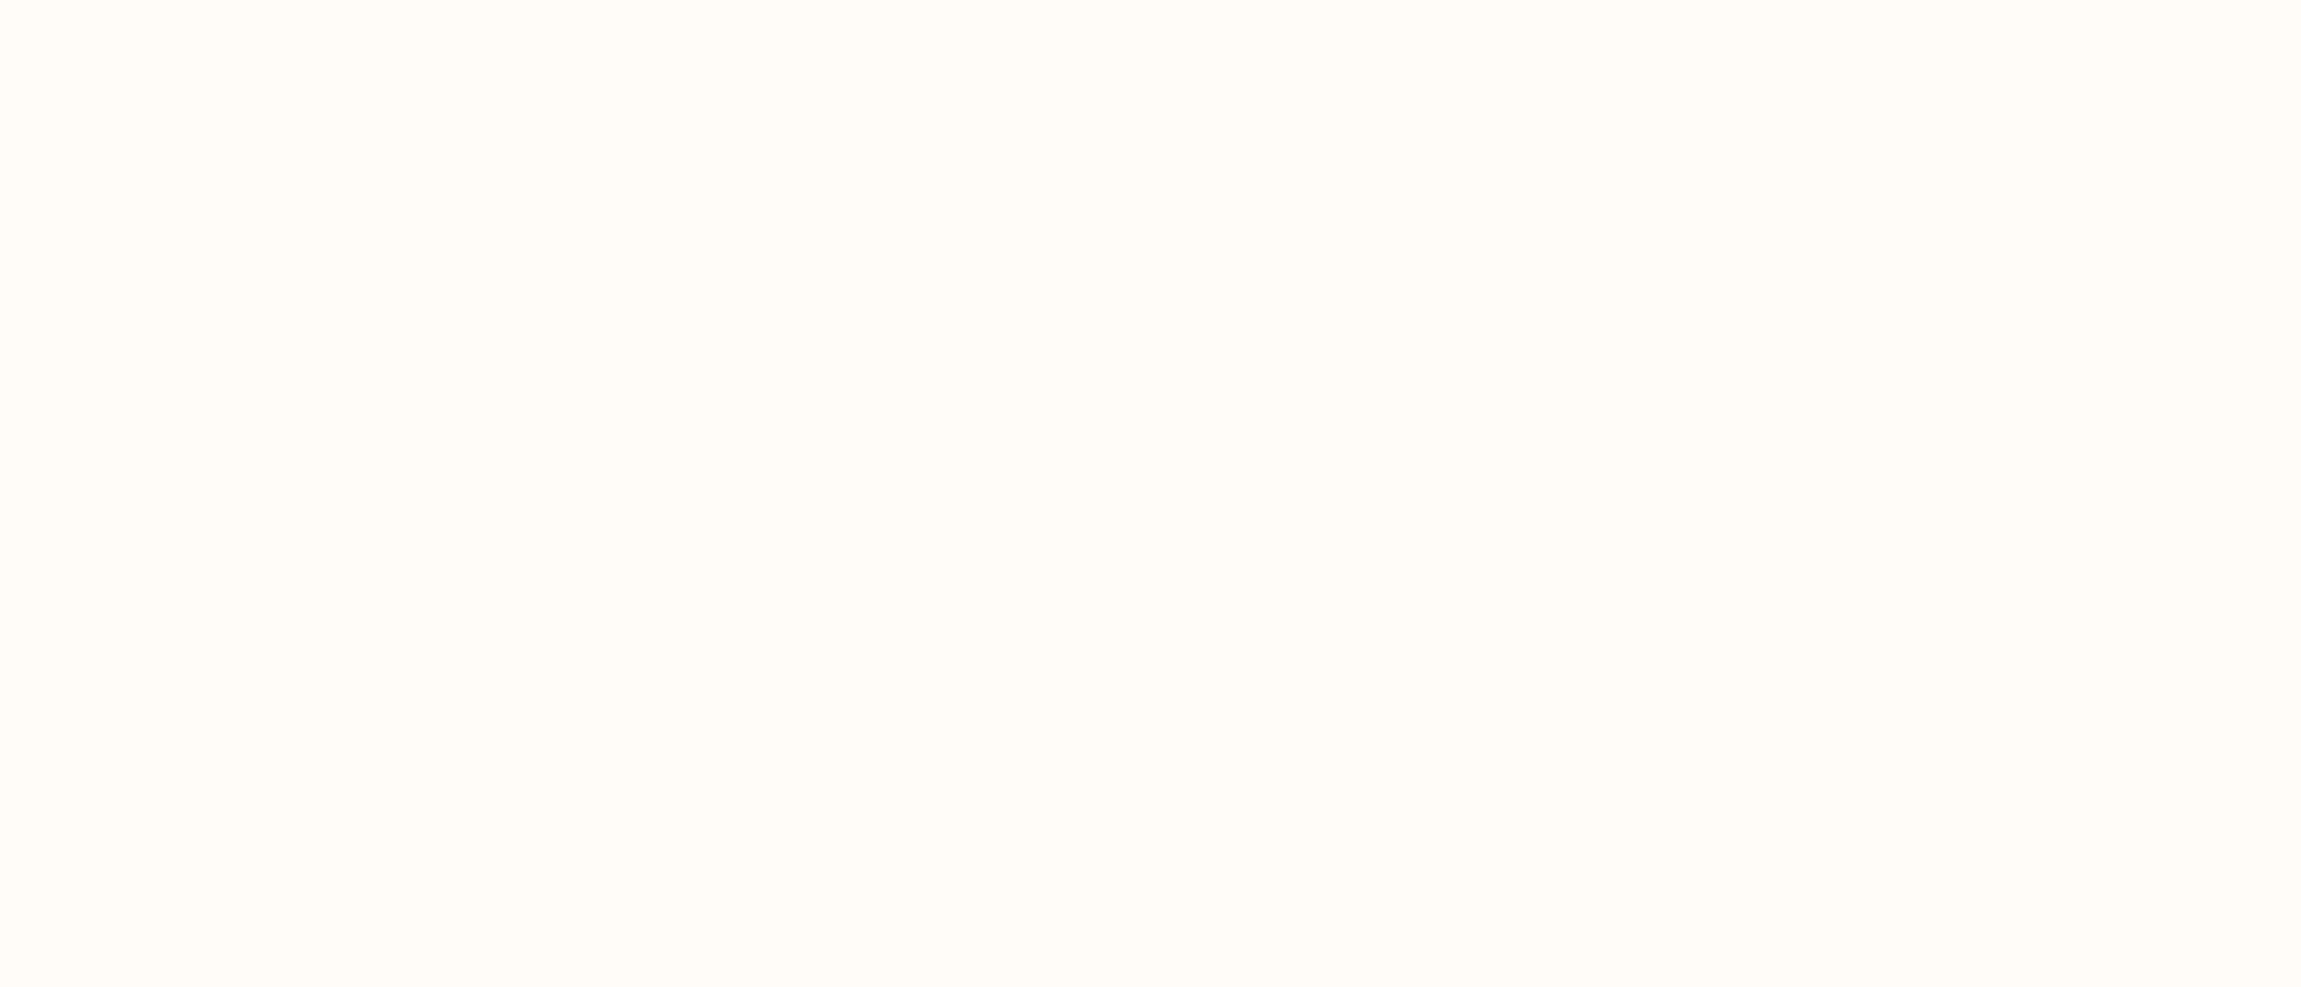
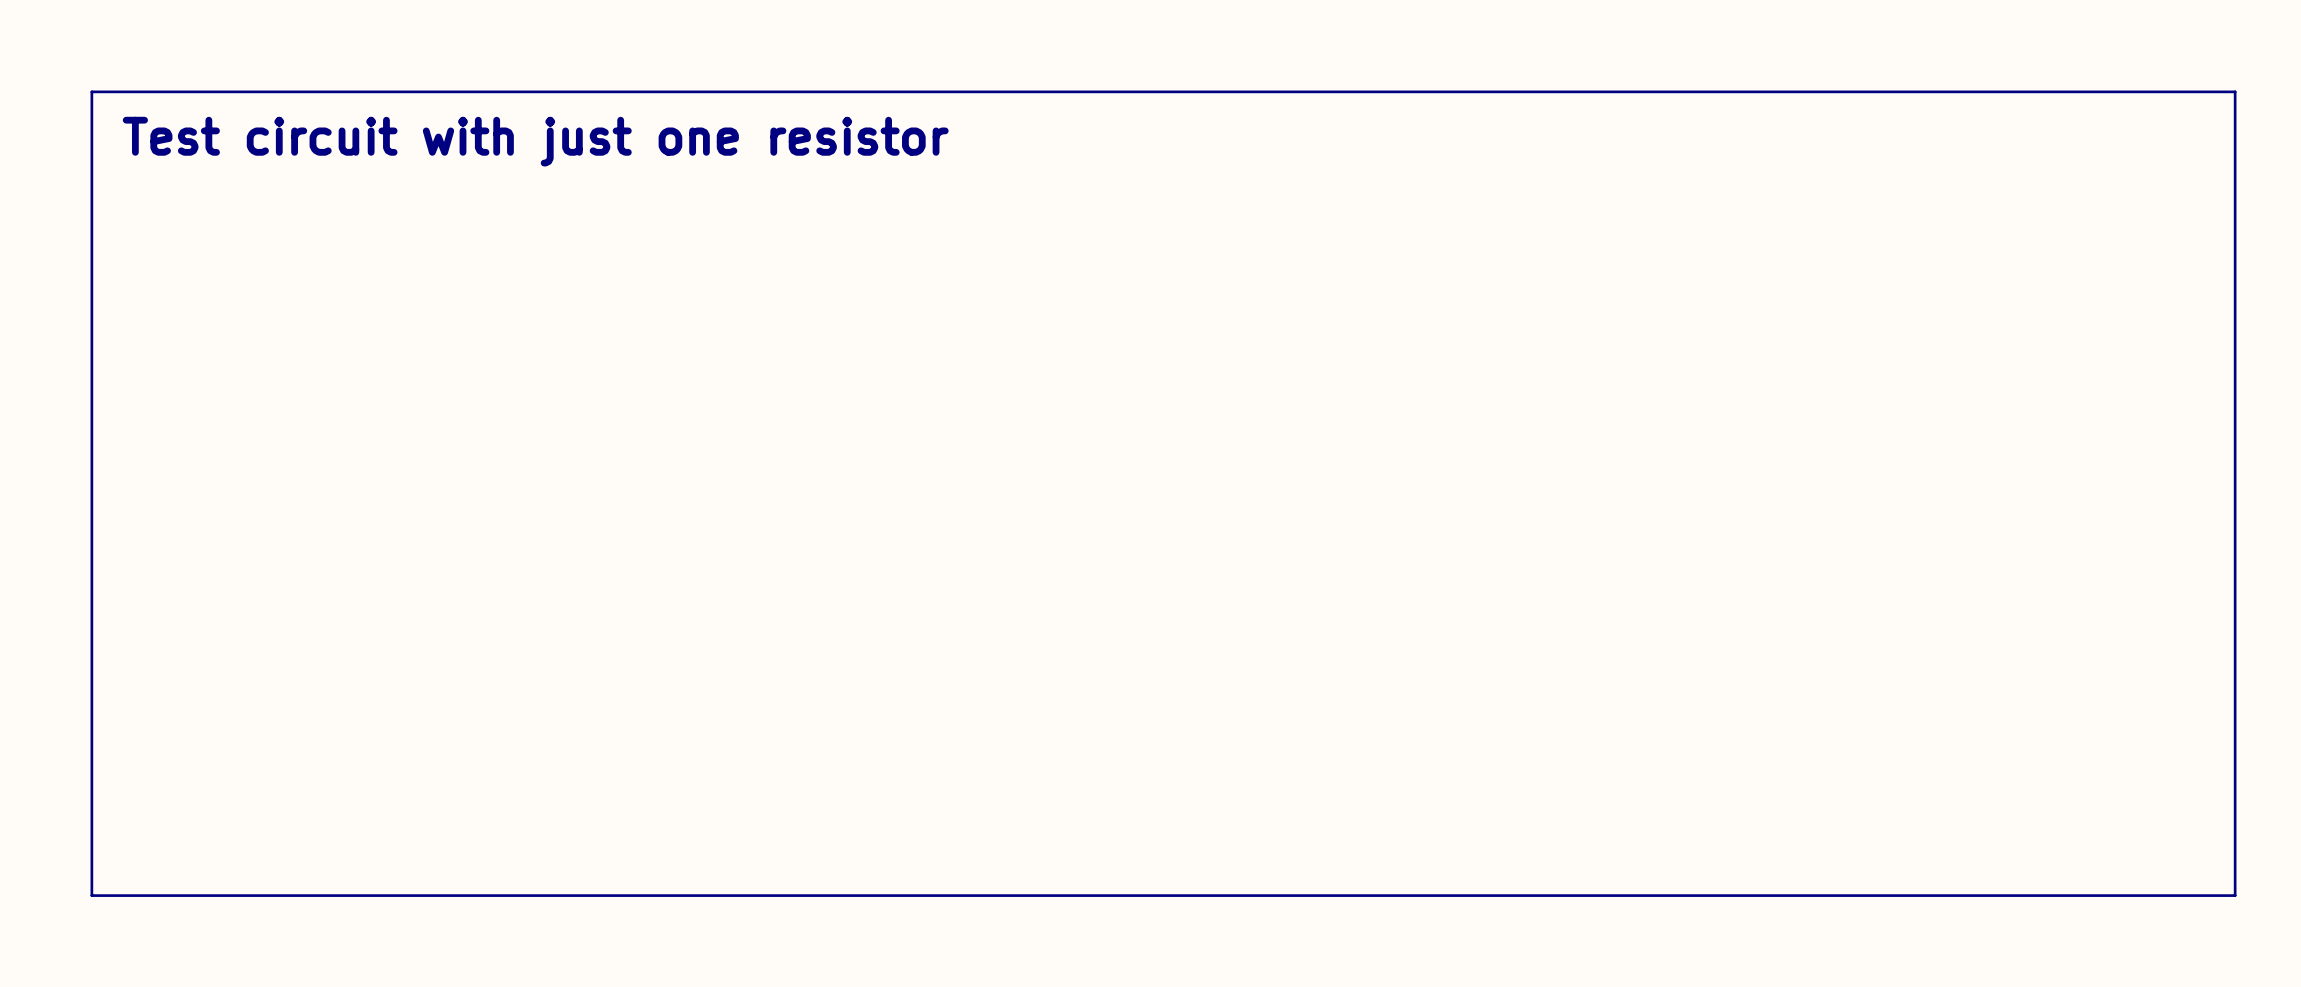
line: none -> (91, 91) (2235, 91) (2235, 895) (91, 895) (91, 91)
text: none -> Test circuit with just one resistor (535, 141)

